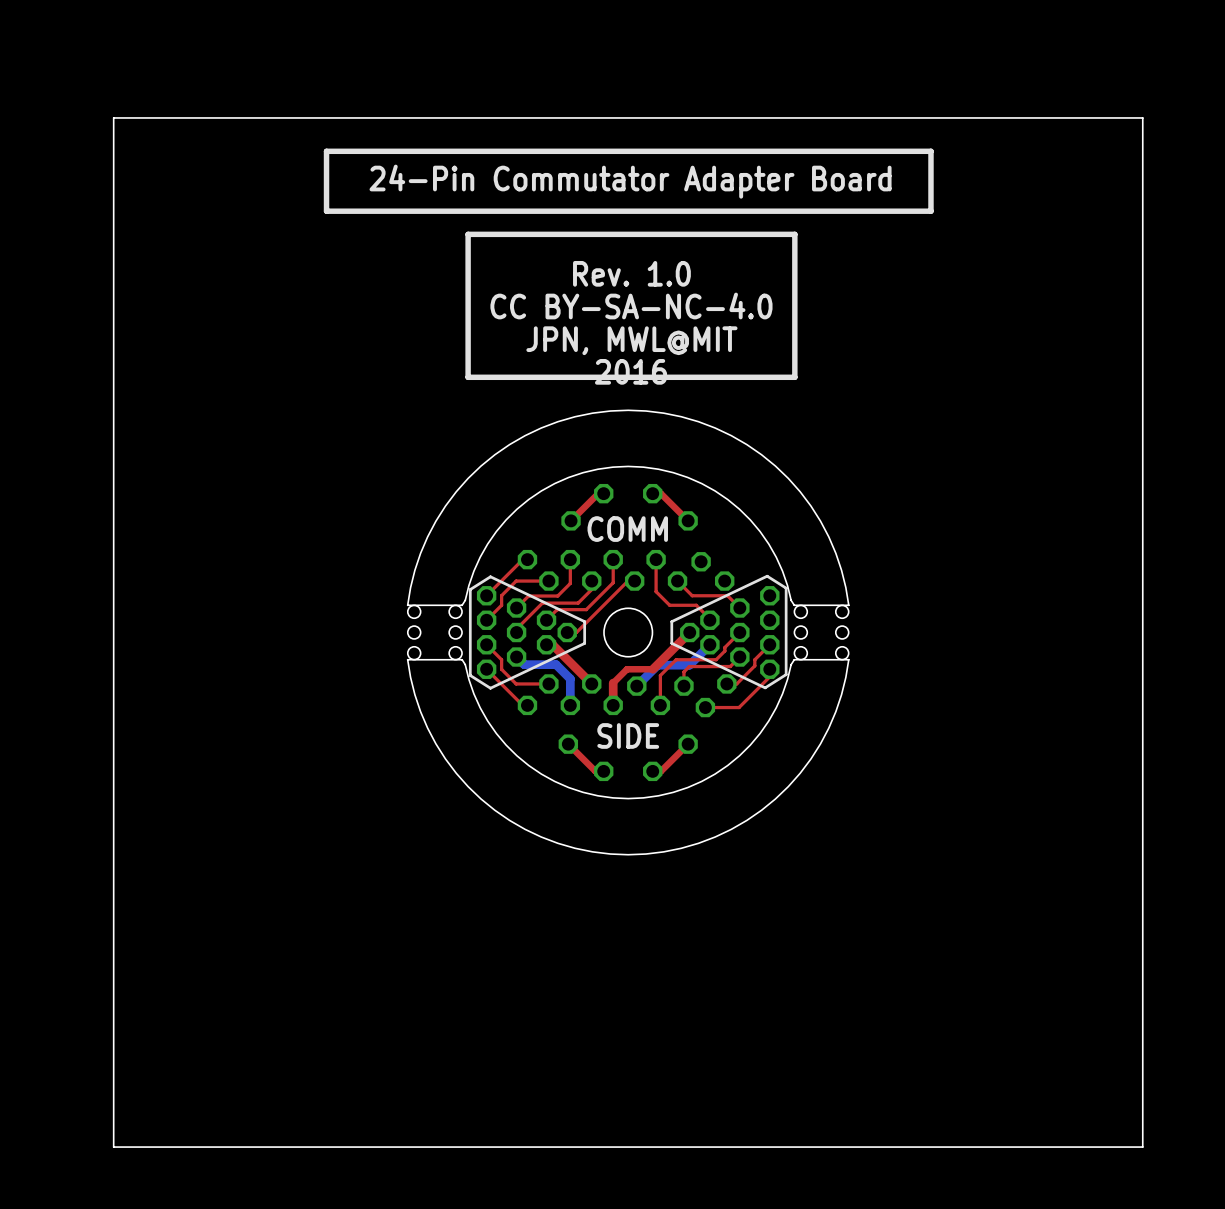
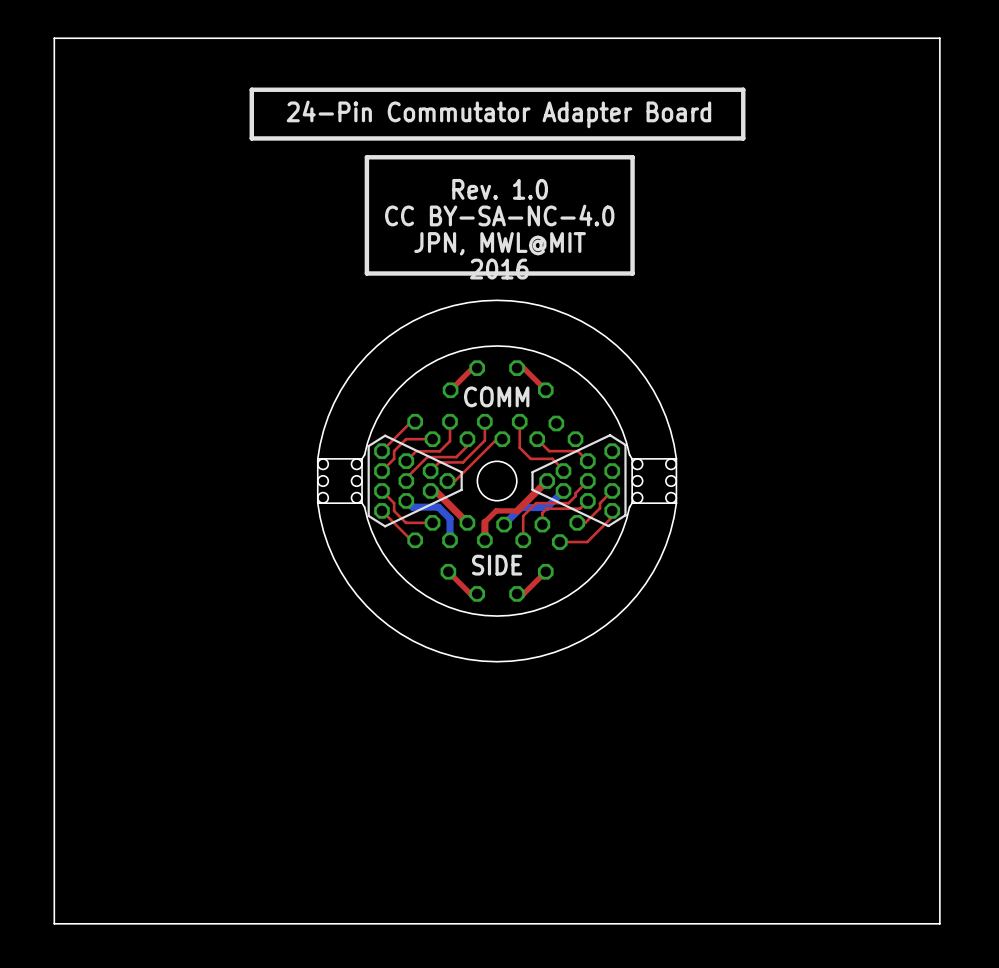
board edge: (113, 117) (113, 1147) (1142, 1147) (1142, 117) (113, 117) -> (54, 38) (54, 923) (939, 923) (939, 38) (54, 38)
board edge: none -> (317, 458) (317, 503)
board edge: none -> (362, 458) (362, 503)
board edge: none -> (632, 458) (632, 503)
board edge: none -> (676, 458) (676, 503)

